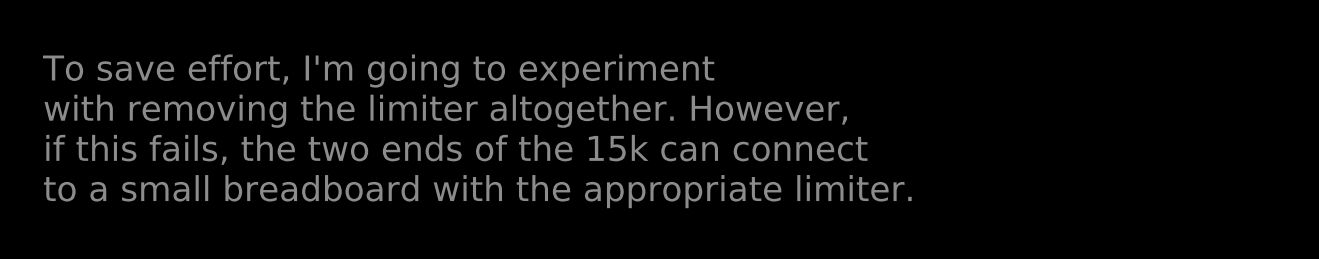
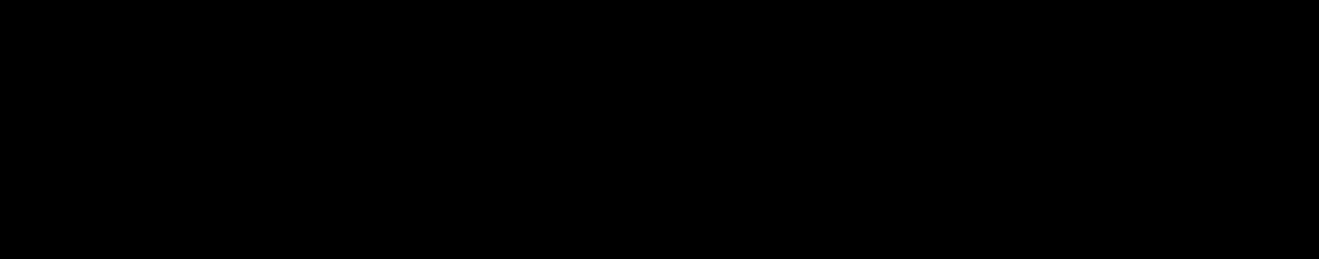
text: To save effort, I'm going to experiment (378, 71) -> none
text: with removing the limiter altogether. However, (445, 111) -> none
text: if this fails, the two ends of the 15k can connect (456, 149) -> none
text: to a small breadboard with the appropriate limiter. (477, 191) -> none

